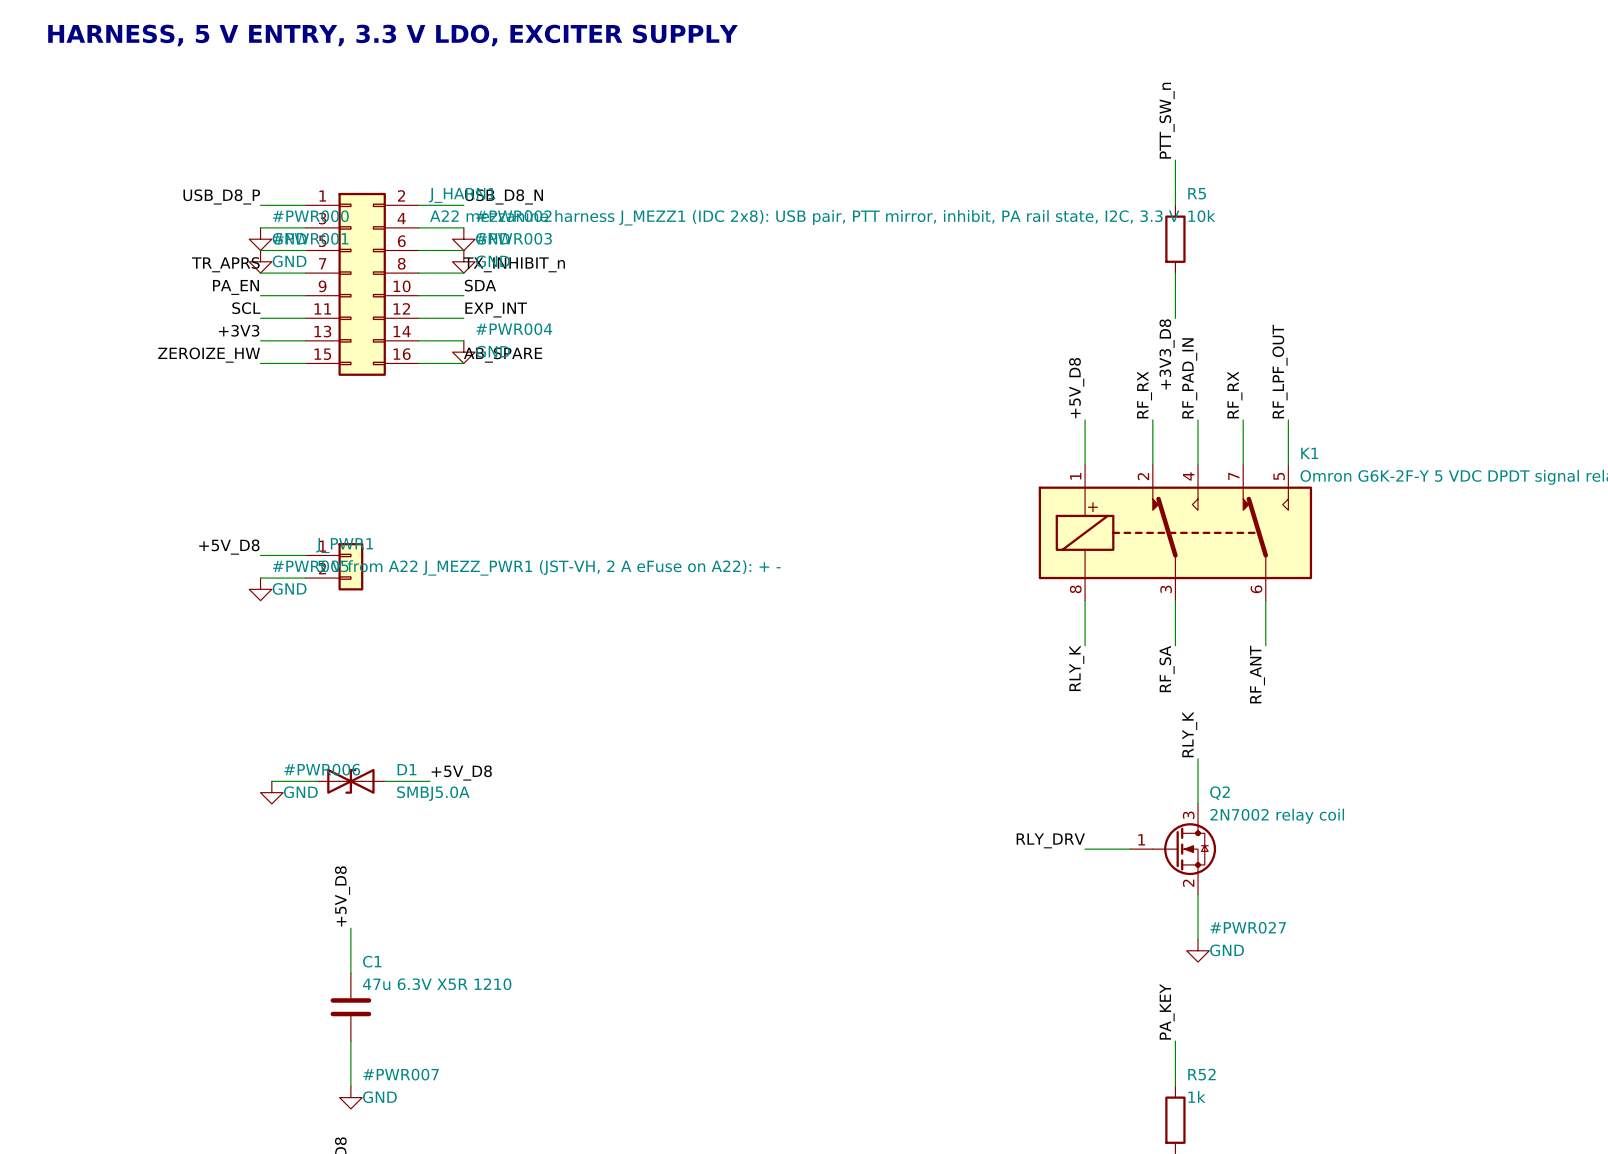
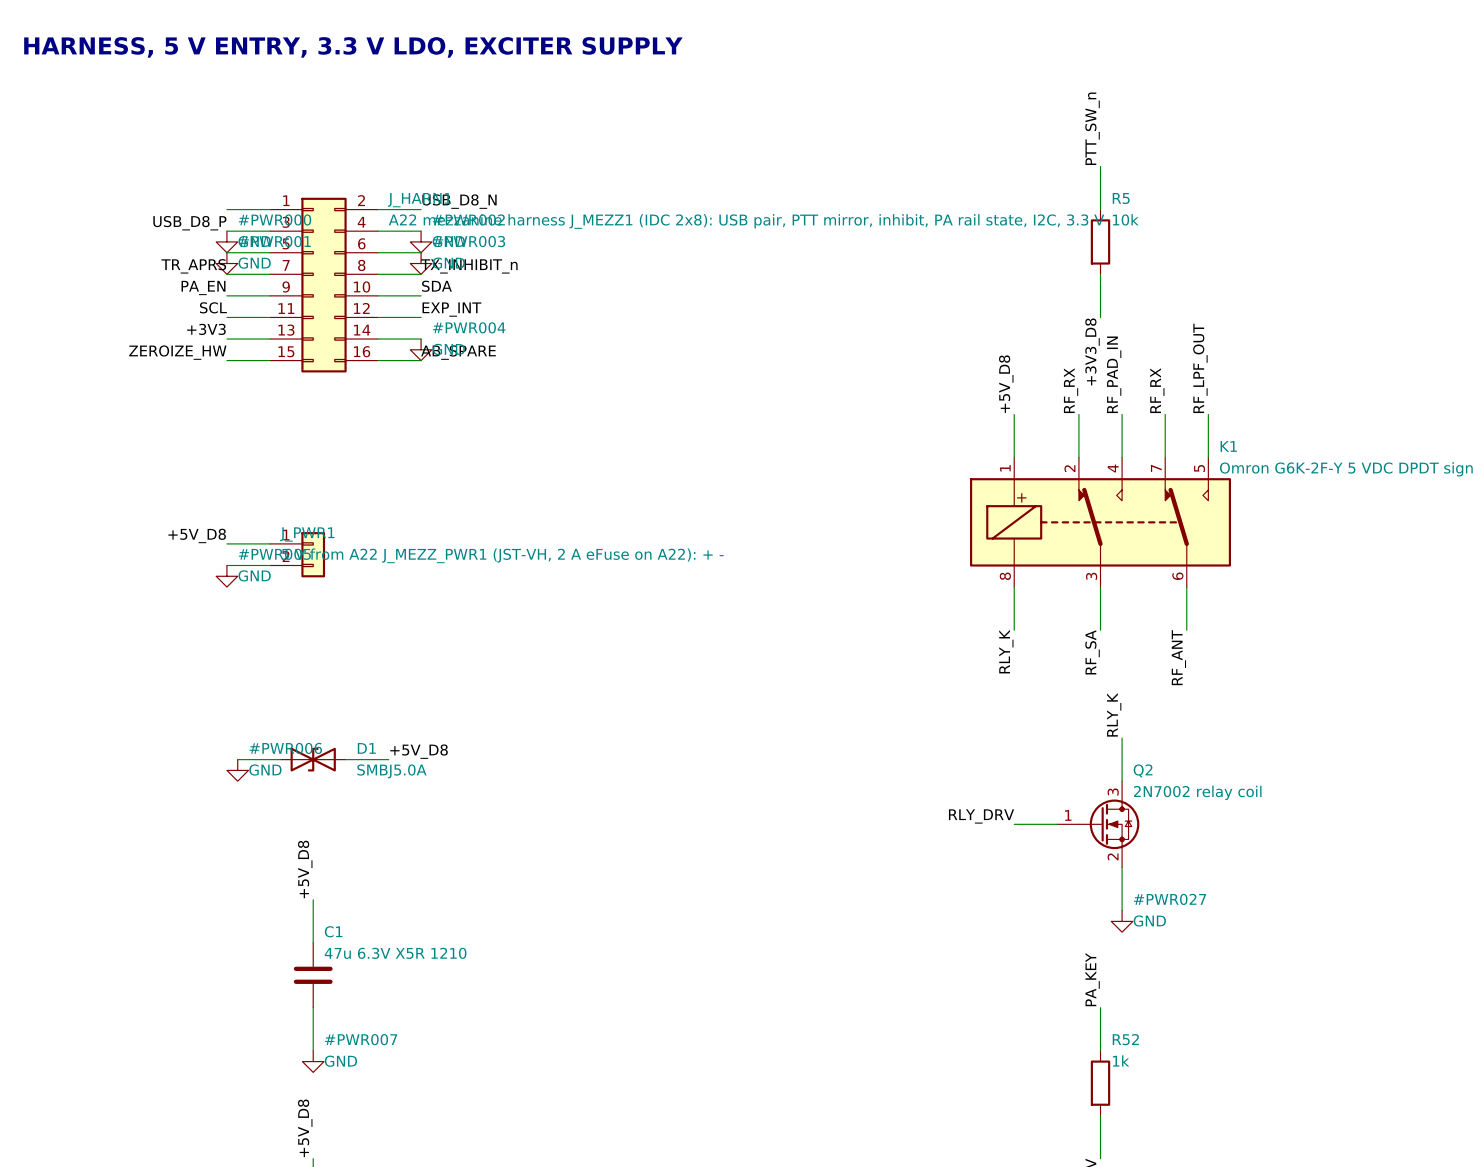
label position: USB_D8_P (221, 196) -> USB_D8_P (189, 223)

